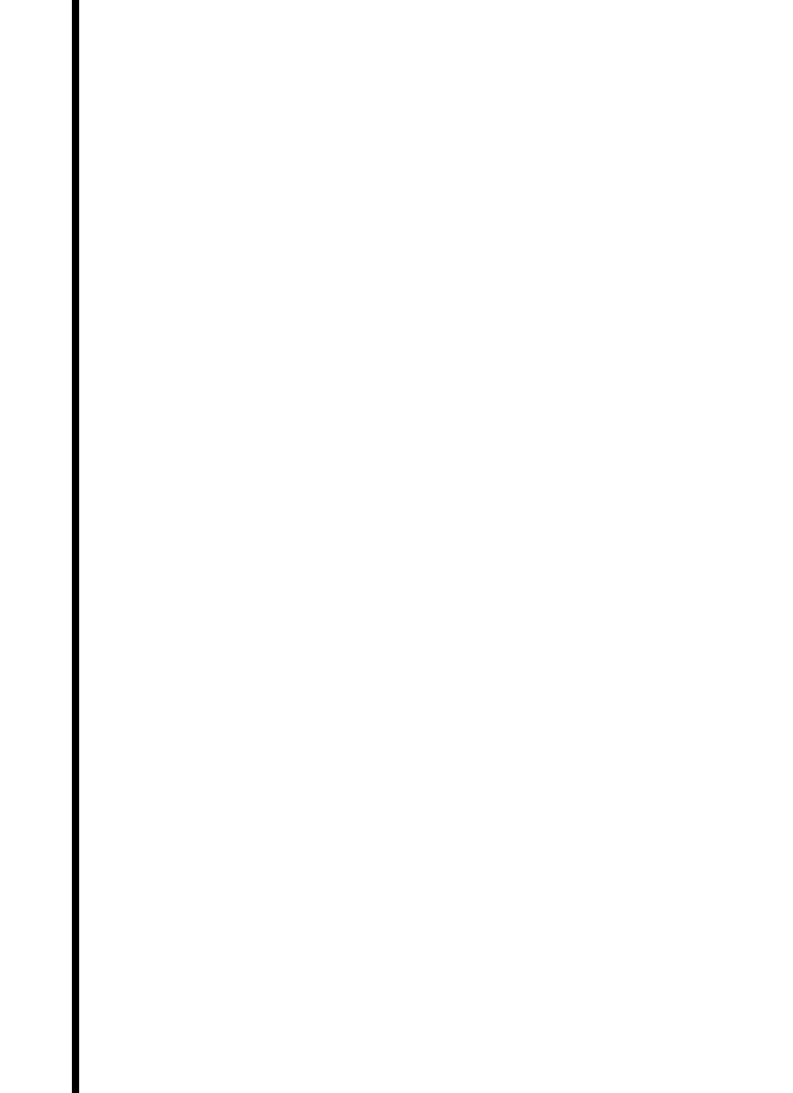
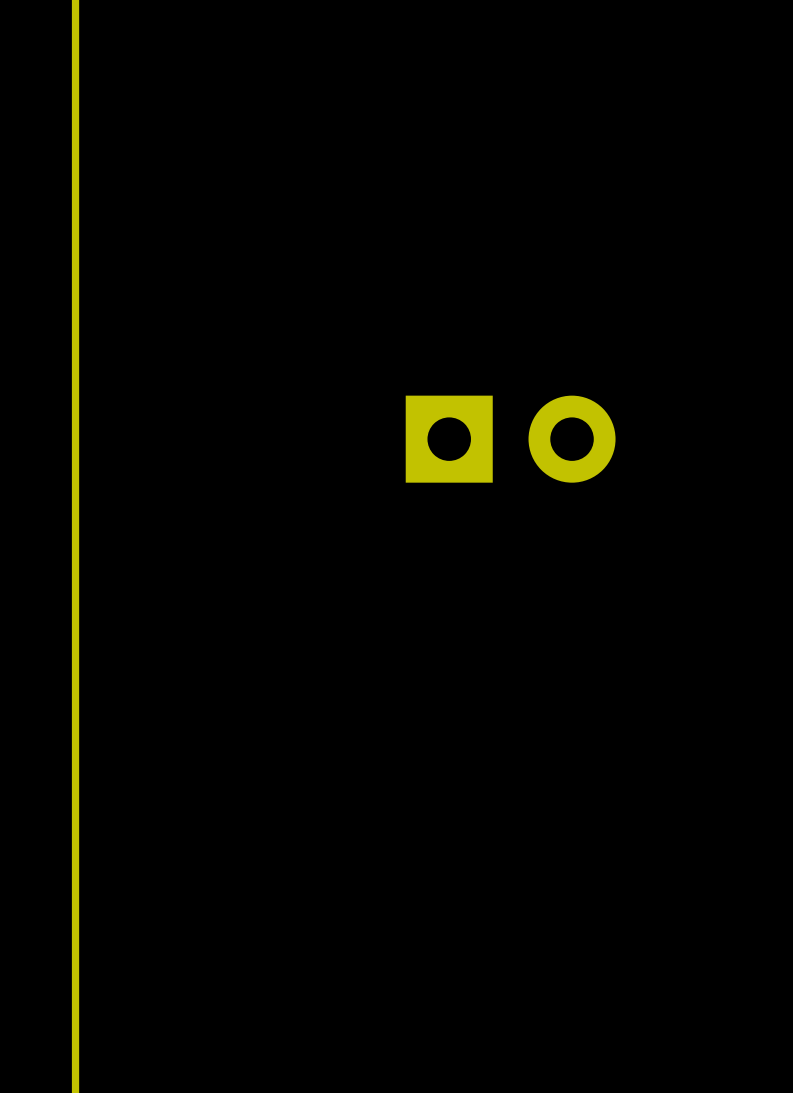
part: none -> (510, 439)

